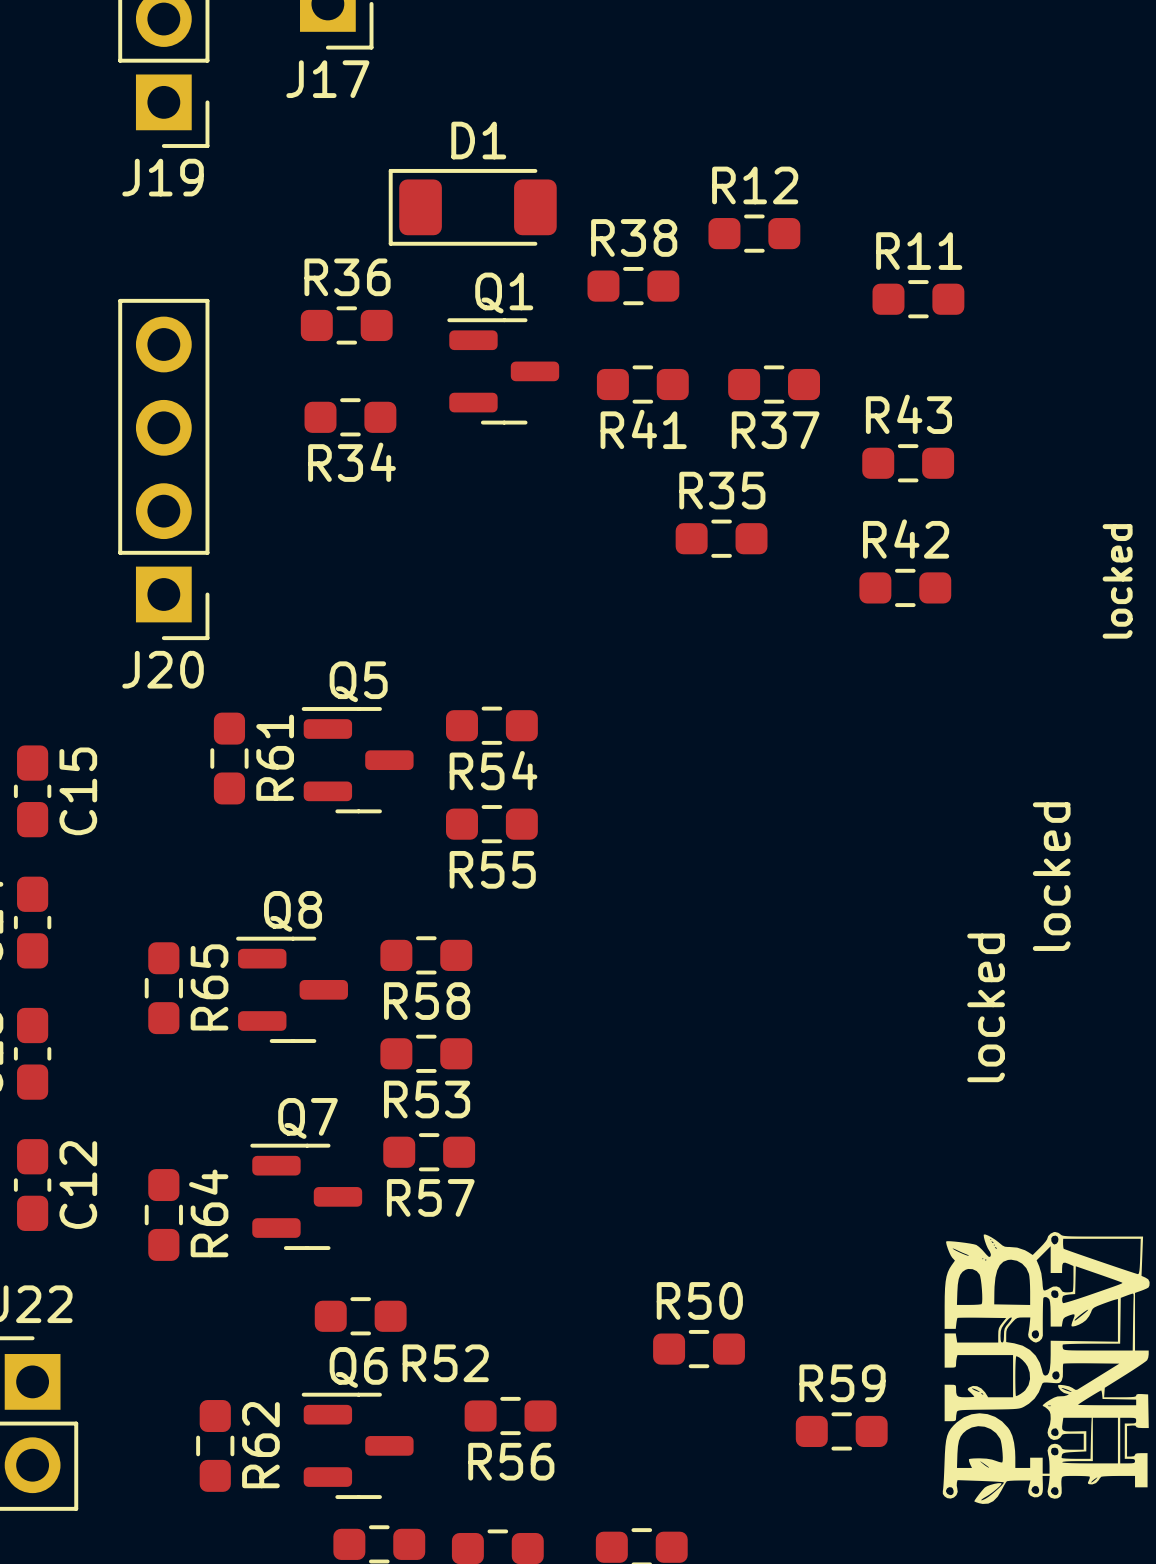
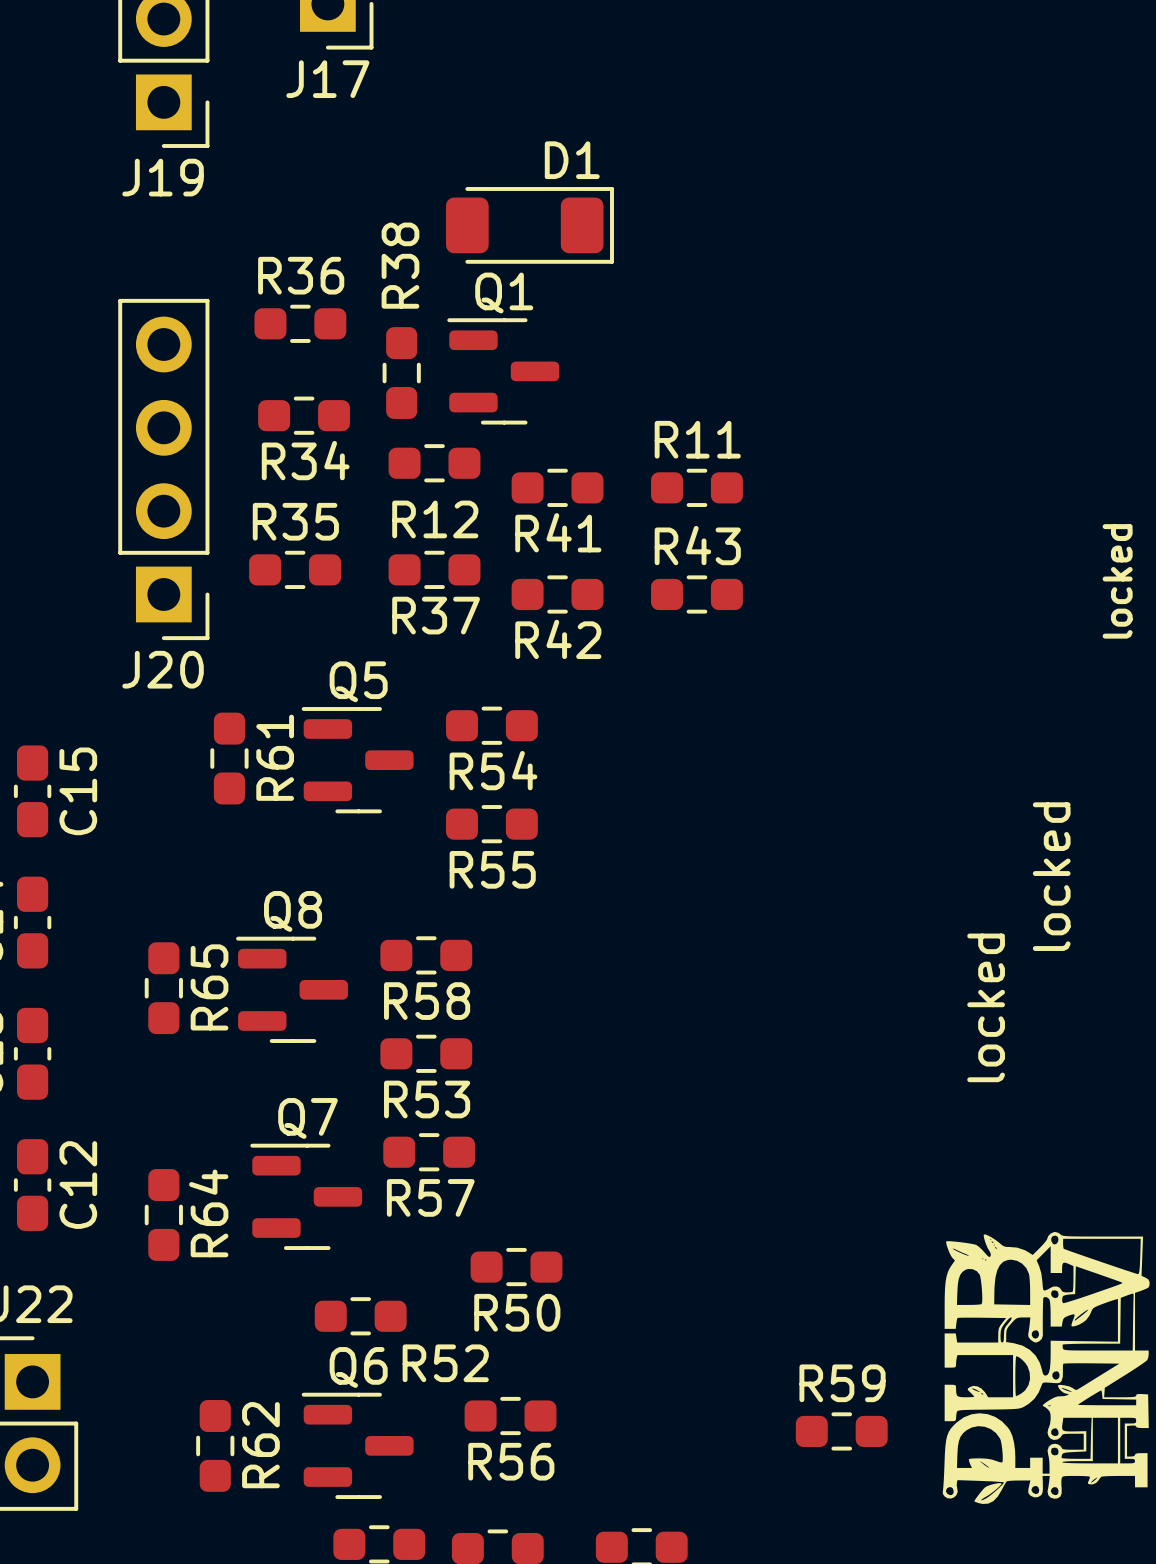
R12 name position: R12 (755, 185) -> R12 (435, 519)
D1 rotation: 0° (472, 207) -> 180° (529, 225)
R12 position: (754, 233) -> (434, 463)
R38 rotation: 0° (633, 286) -> 90° clockwise (401, 373)
R38 position: (633, 286) -> (401, 373)
R11 position: (918, 299) -> (696, 487)
R36 position: (346, 325) -> (300, 323)
R41 position: (642, 384) -> (557, 487)
R37 position: (774, 384) -> (434, 569)
R34 position: (350, 417) -> (304, 415)
R43 position: (908, 463) -> (696, 594)
R35 position: (721, 538) -> (295, 569)
R42 name position: R42 (906, 539) -> R42 (558, 639)
R42 position: (905, 587) -> (557, 594)
R50 name position: R50 (699, 1300) -> R50 (517, 1312)
R50 position: (699, 1349) -> (516, 1267)

